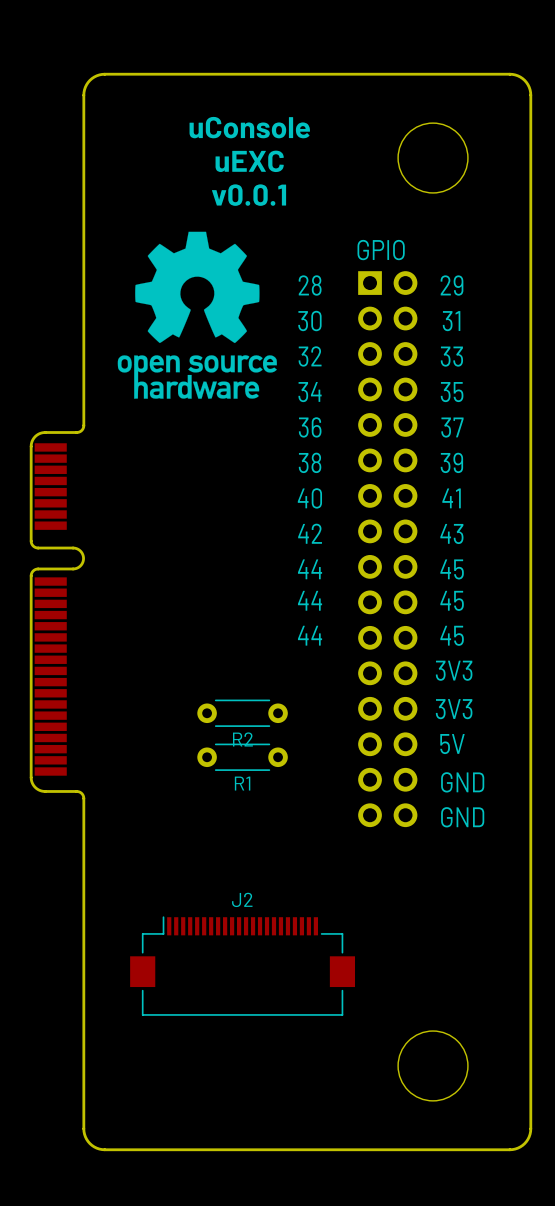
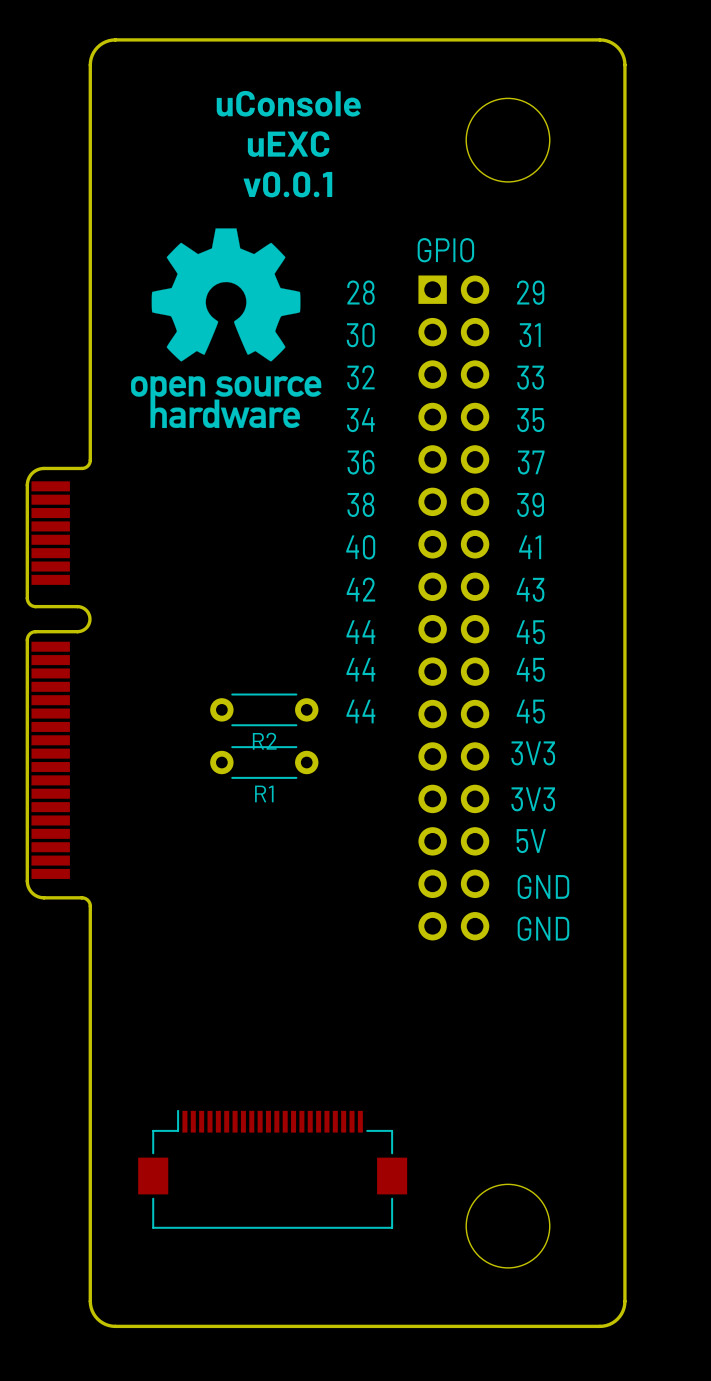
R2 position: (242, 713) -> (264, 709)
R1 position: (242, 757) -> (264, 762)
J2: (242, 966) -> none
part: none -> (272, 1169)

